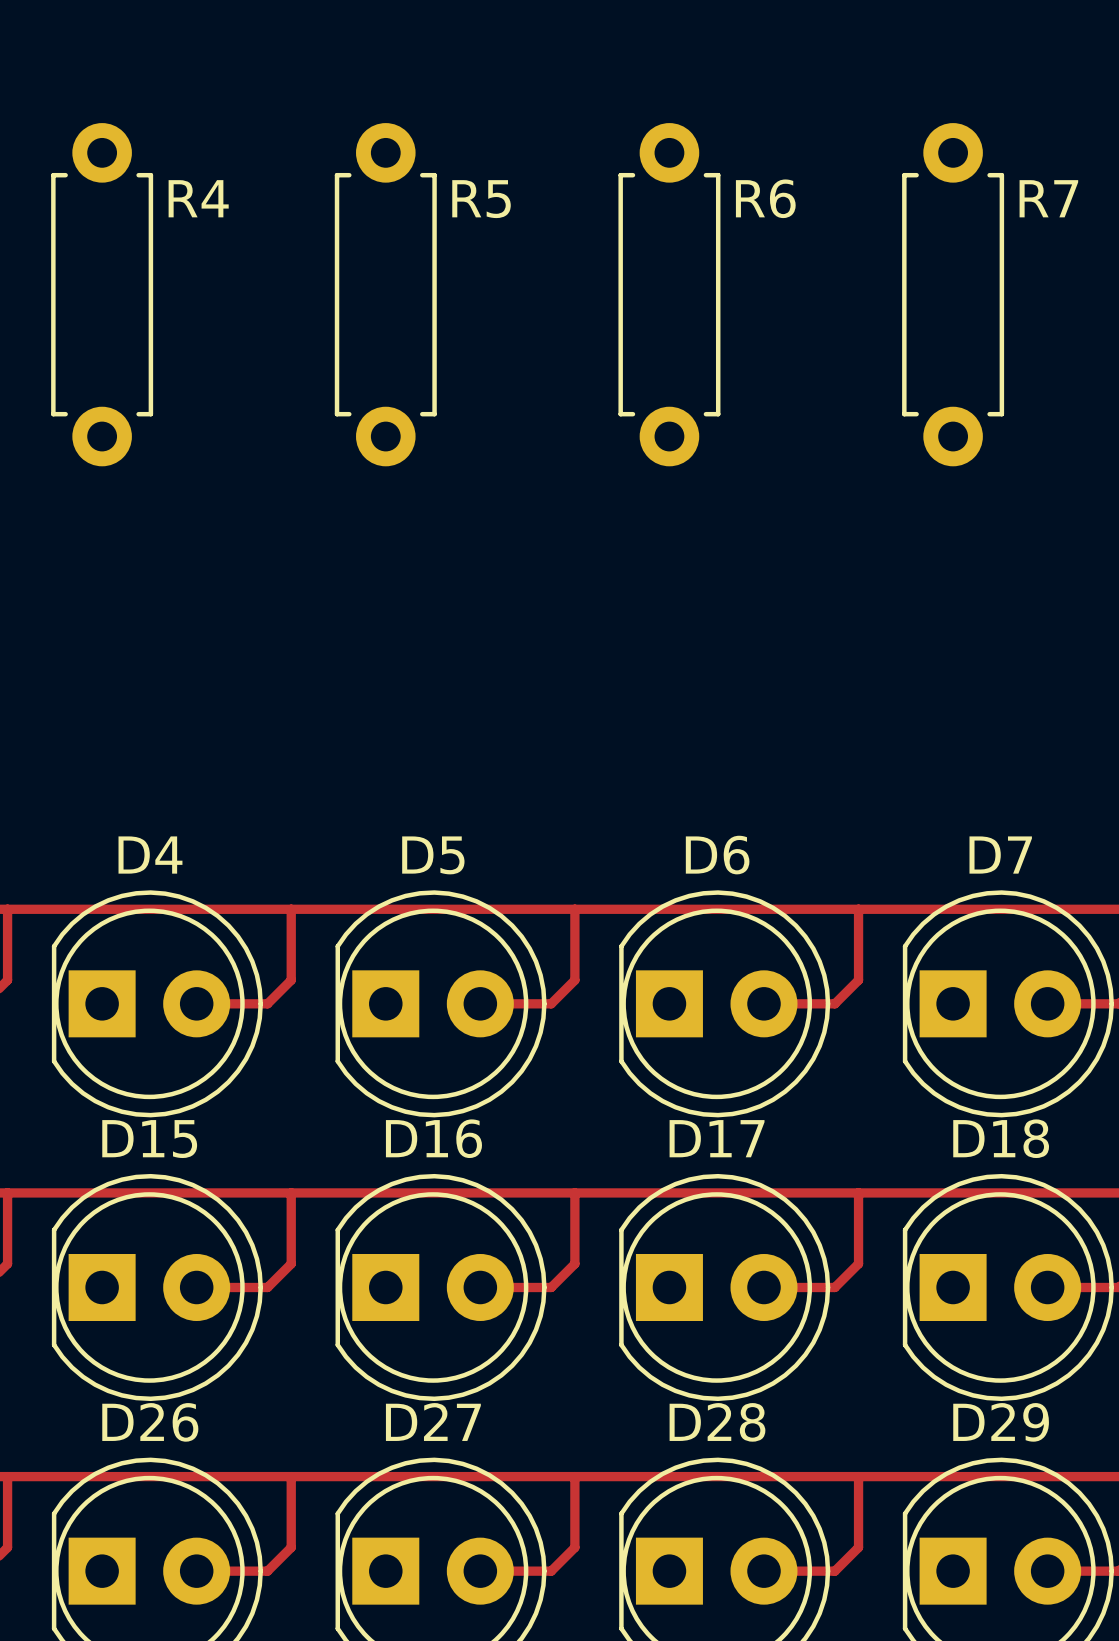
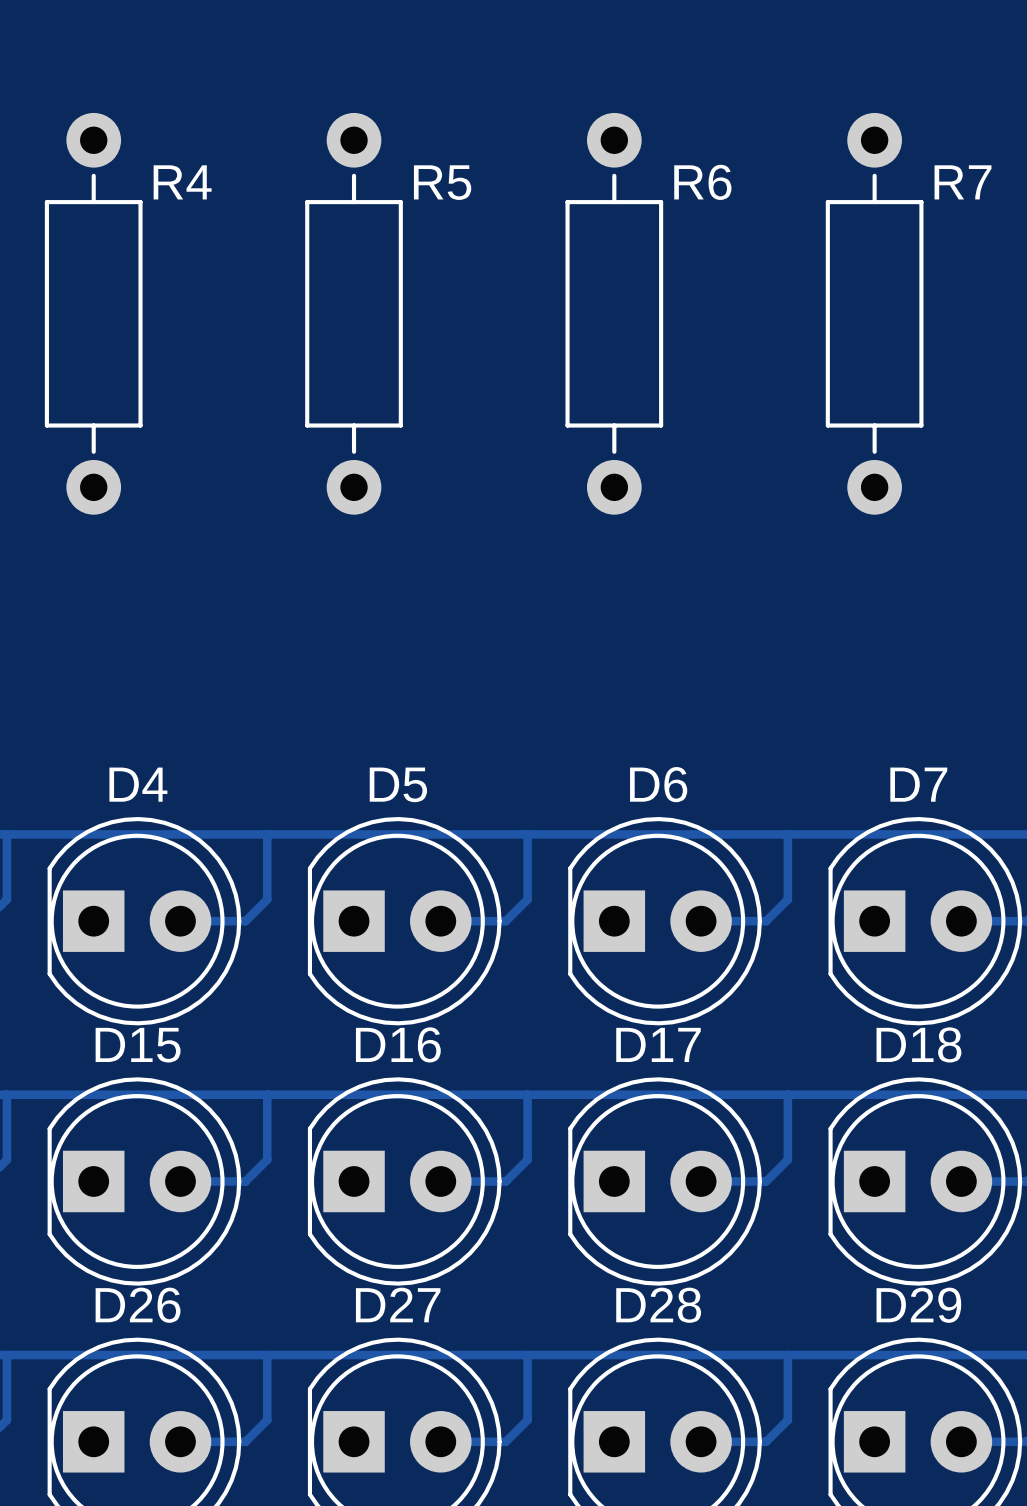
R4 footprint: [51, 123, 154, 467] -> [44, 112, 143, 515]
R5 footprint: [334, 123, 437, 467] -> [305, 112, 403, 515]
R6 footprint: [618, 123, 721, 467] -> [565, 112, 664, 515]
R7 footprint: [902, 123, 1005, 467] -> [825, 112, 924, 515]

